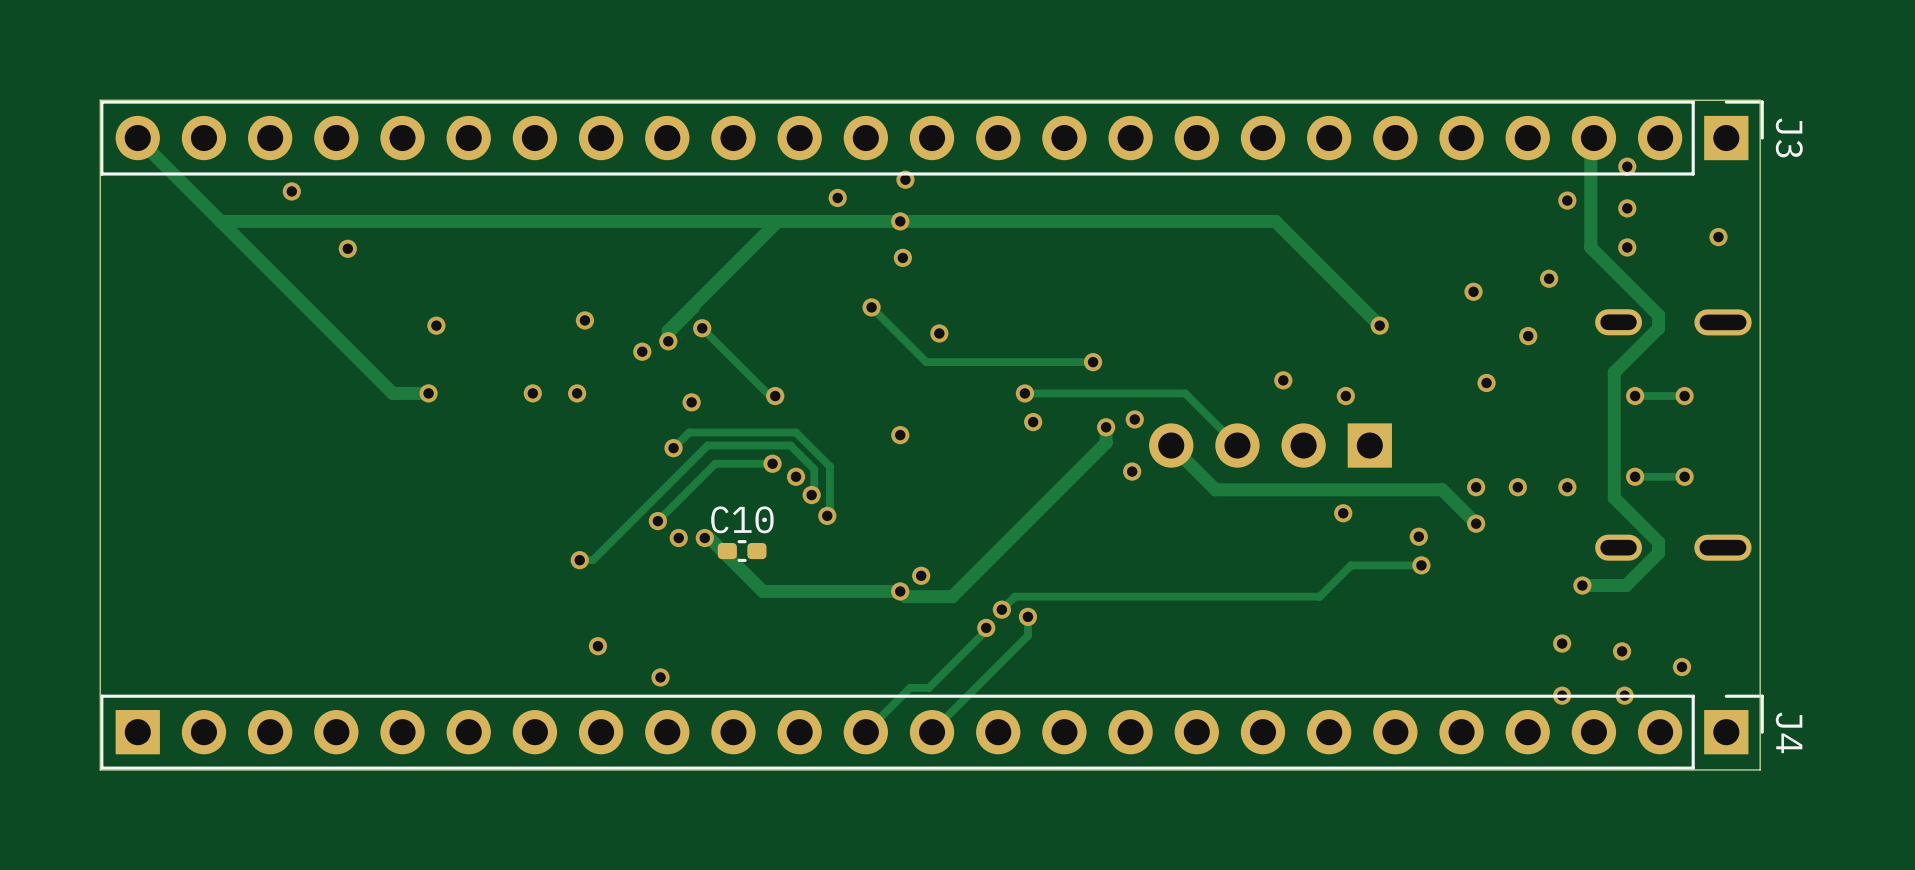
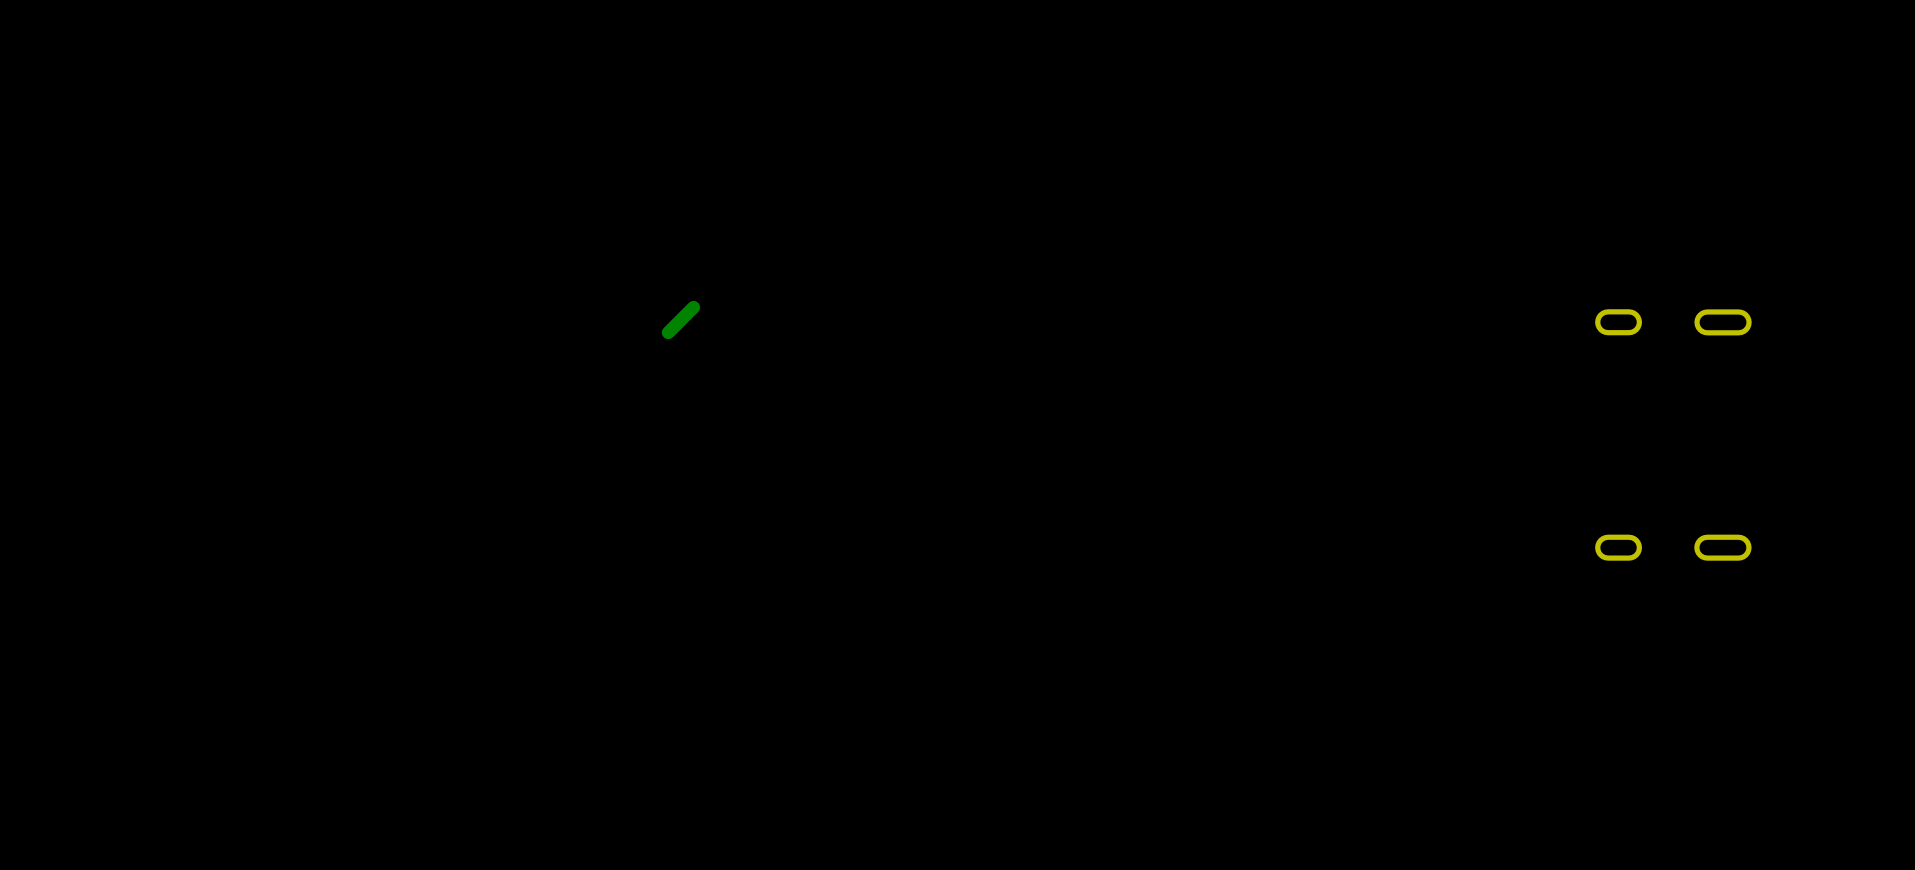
board edge: (1760, 100) (100, 100) (100, 769) (1760, 769) (1760, 100) -> none
track: (137, 138) (392, 393) (428, 393) -> none
J3: (932, 138) -> none
track: (1593, 138) (1590, 141) (1590, 247) (1658, 315) (1658, 328) (1614, 372) (1614, 497) (1658, 542) (1658, 553) (1626, 585) (1582, 585) -> none
via: (1627, 166) -> none
via: (905, 179) -> none
via: (291, 191) -> none
via: (837, 197) -> none
via: (1567, 200) -> none
via: (1627, 208) -> none
track: (220, 221) (1275, 221) (1379, 325) -> none
track: (777, 221) (668, 330) (668, 341) -> none
via: (900, 221) -> none
via: (1718, 237) -> none
via: (1627, 247) -> none
via: (347, 248) -> none
via: (902, 257) -> none
via: (1549, 278) -> none
via: (1473, 291) -> none
track: (871, 307) (926, 362) (1093, 362) -> none
via: (871, 307) -> none
via: (584, 320) -> none
via: (436, 325) -> none
via: (1379, 325) -> none
track: (702, 328) (769, 396) (775, 396) -> none
via: (702, 328) -> none
via: (939, 333) -> none
via: (1528, 336) -> none
via: (668, 341) -> none
via: (642, 351) -> none
via: (1093, 362) -> none
via: (1283, 380) -> none
via: (1486, 382) -> none
via: (428, 393) -> none
via: (532, 393) -> none
via: (577, 393) -> none
track: (1024, 393) (1185, 393) (1237, 445) -> none
via: (1024, 393) -> none
via: (775, 396) -> none
via: (1345, 396) -> none
via: (1635, 396) -> none
track: (1684, 396) (1635, 396) -> none
via: (1684, 396) -> none
via: (691, 402) -> none
via: (1134, 419) -> none
via: (1033, 422) -> none
track: (1106, 427) (1106, 442) (952, 596) (905, 596) (900, 591) (762, 591) (709, 538) (704, 538) -> none
via: (1106, 427) -> none
via: (900, 435) -> none
track: (1171, 445) (1215, 489) (1442, 489) (1476, 523) -> none
part: (1270, 445) -> none
track: (673, 448) (689, 432) (795, 432) (829, 466) (829, 513) (827, 515) -> none
via: (673, 448) -> none
track: (772, 463) (715, 463) (657, 521) -> none
via: (772, 463) -> none
via: (1132, 471) -> none
via: (796, 476) -> none
via: (1635, 476) -> none
track: (1684, 476) (1635, 476) -> none
via: (1684, 476) -> none
via: (1476, 487) -> none
via: (1517, 487) -> none
via: (1567, 487) -> none
track: (811, 495) (814, 492) (814, 469) (790, 445) (707, 445) (593, 560) (579, 560) -> none
via: (811, 495) -> none
via: (1343, 513) -> none
via: (827, 515) -> none
via: (657, 521) -> none
via: (1476, 523) -> none
via: (1418, 536) -> none
via: (678, 538) -> none
via: (704, 538) -> none
C10: (742, 551) -> none
via: (579, 560) -> none
track: (1421, 565) (1351, 565) (1319, 596) (1014, 596) (1001, 609) -> none
via: (1421, 565) -> none
via: (921, 575) -> none
via: (1582, 585) -> none
via: (900, 591) -> none
via: (1001, 609) -> none
track: (1027, 616) (1027, 635) (932, 732) -> none
via: (1027, 616) -> none
track: (986, 627) (986, 630) (928, 687) (910, 687) (865, 732) -> none
via: (986, 627) -> none
via: (1562, 643) -> none
via: (597, 646) -> none
via: (1622, 651) -> none
via: (1682, 667) -> none
via: (660, 677) -> none
via: (1562, 695) -> none
via: (1624, 695) -> none
J4: (932, 732) -> none

